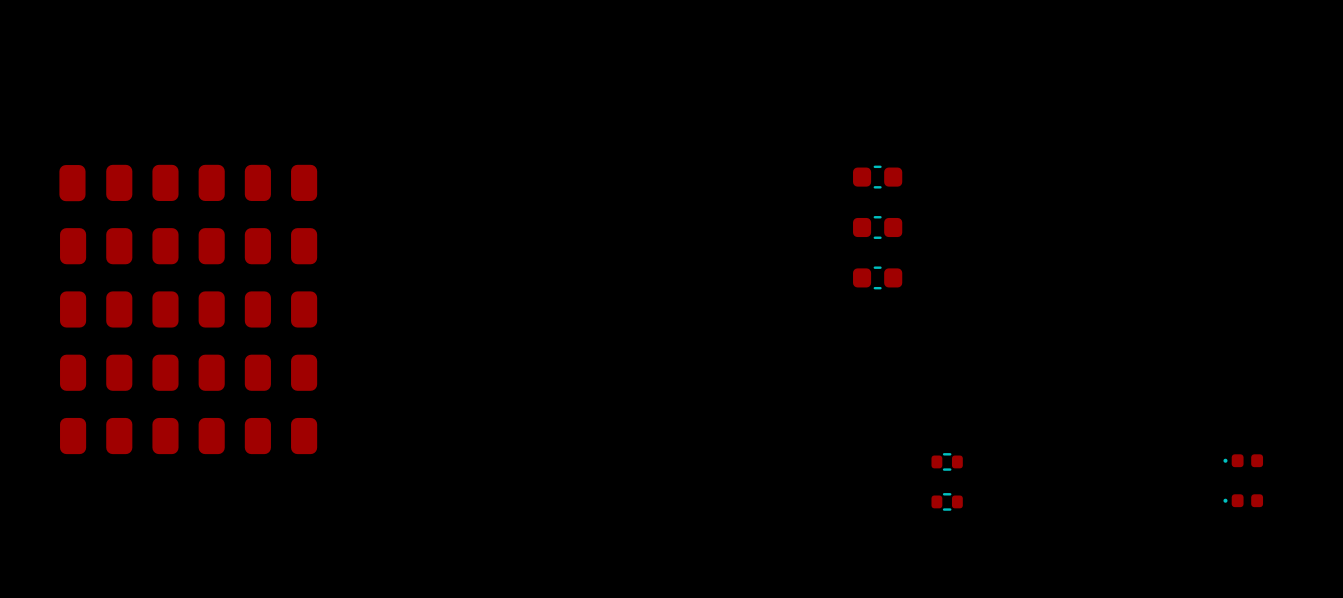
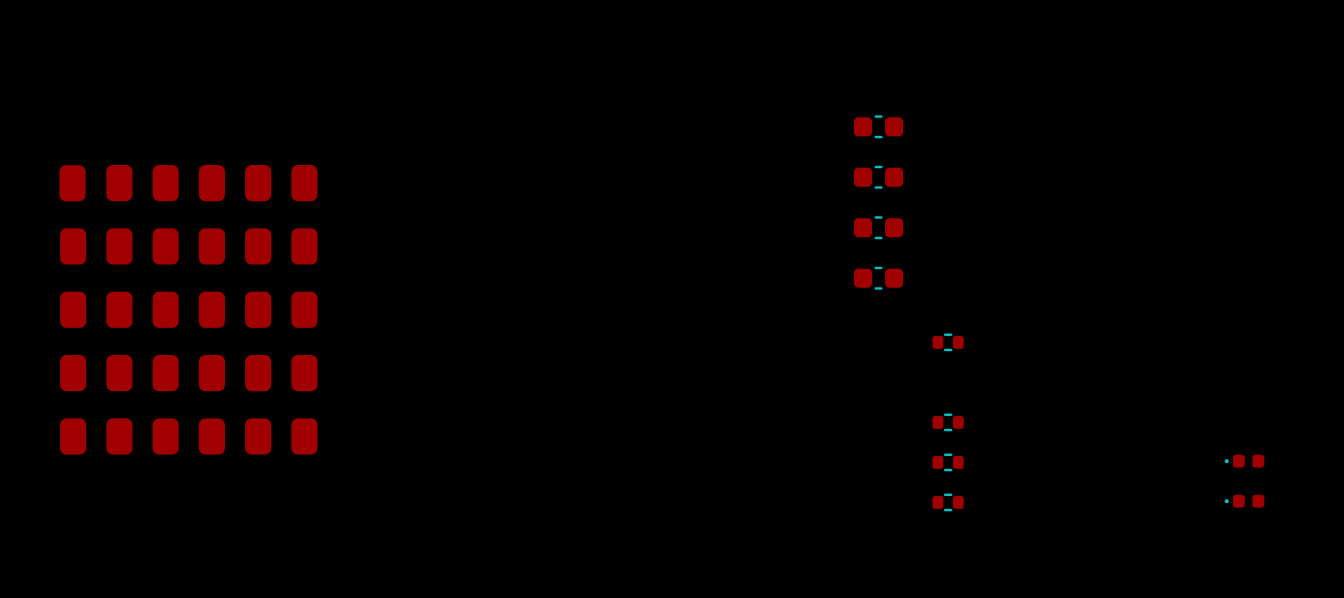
part: none -> (878, 126)
part: none -> (948, 342)
part: none -> (948, 422)

